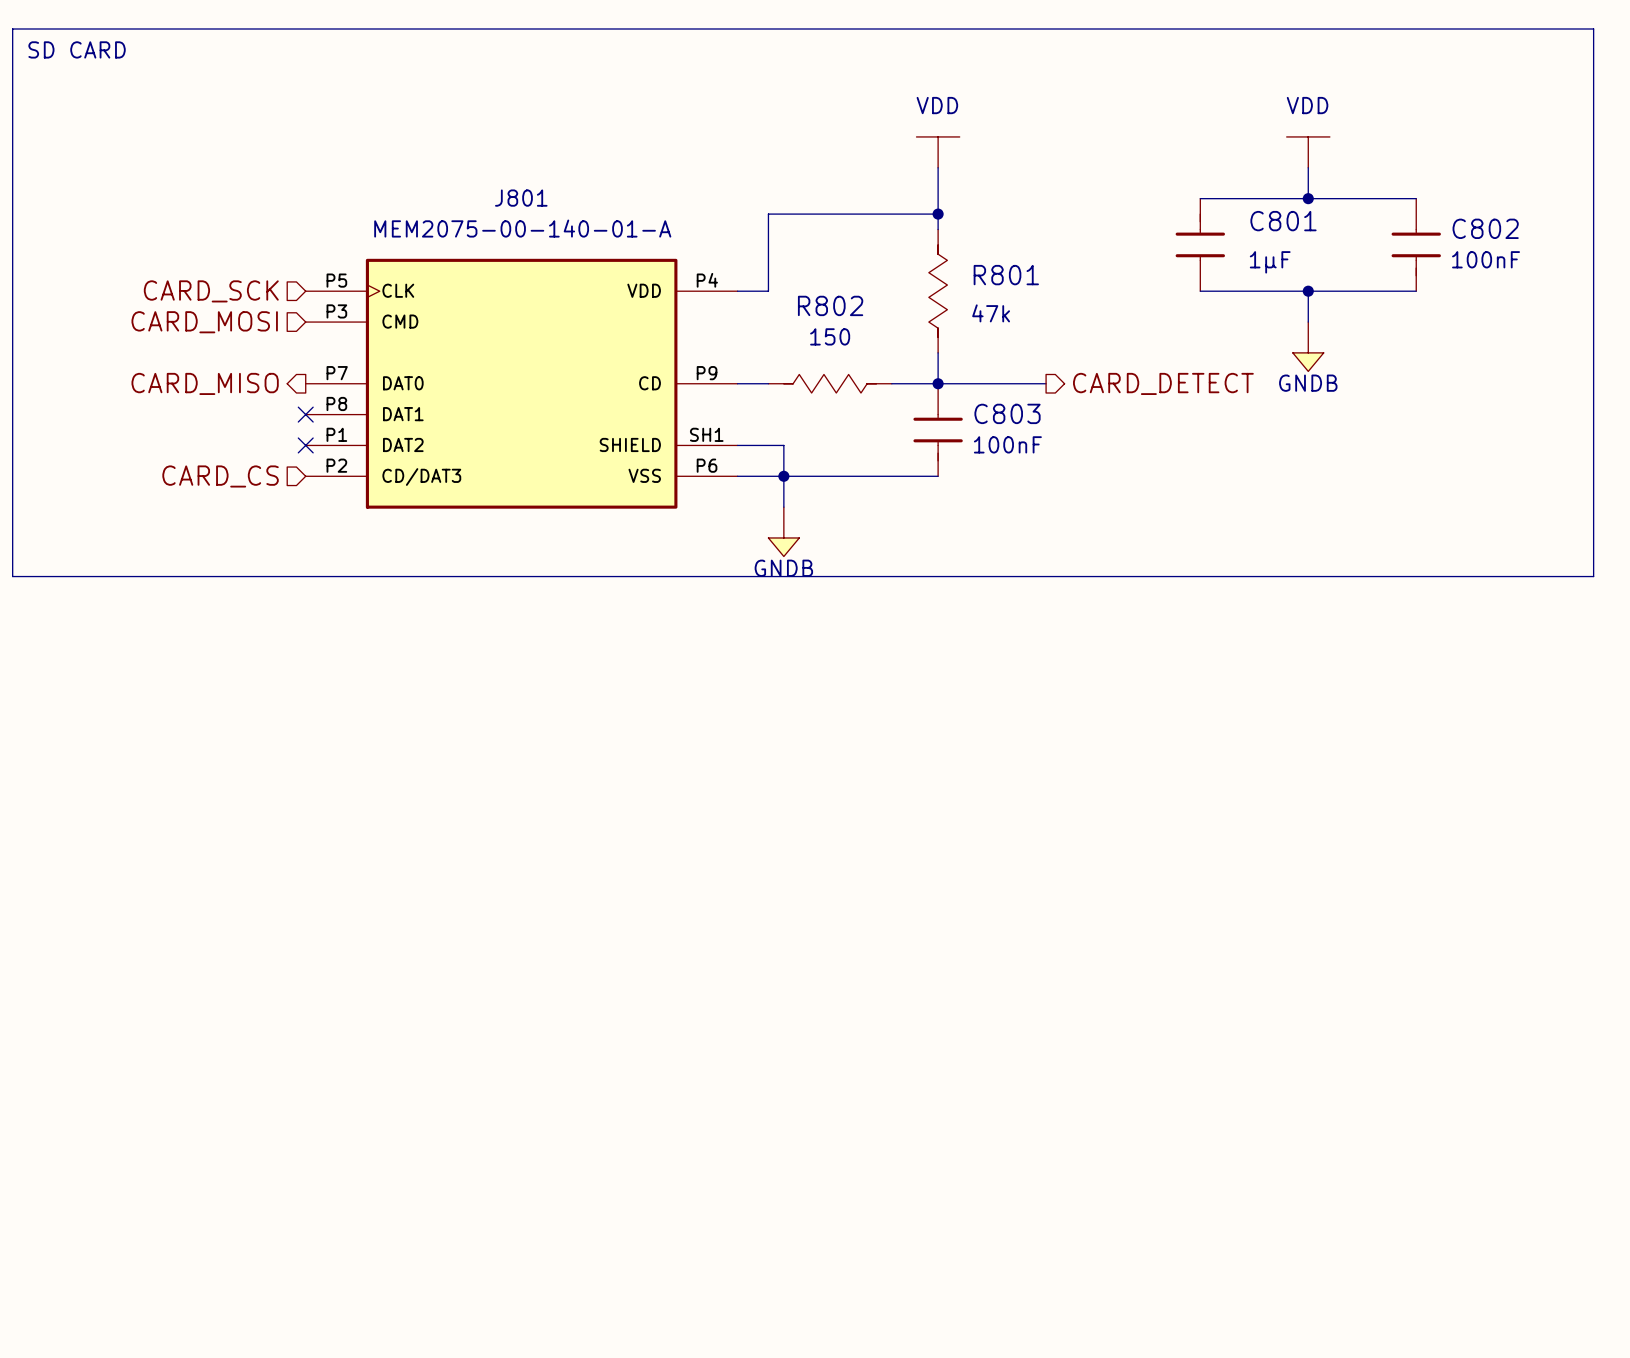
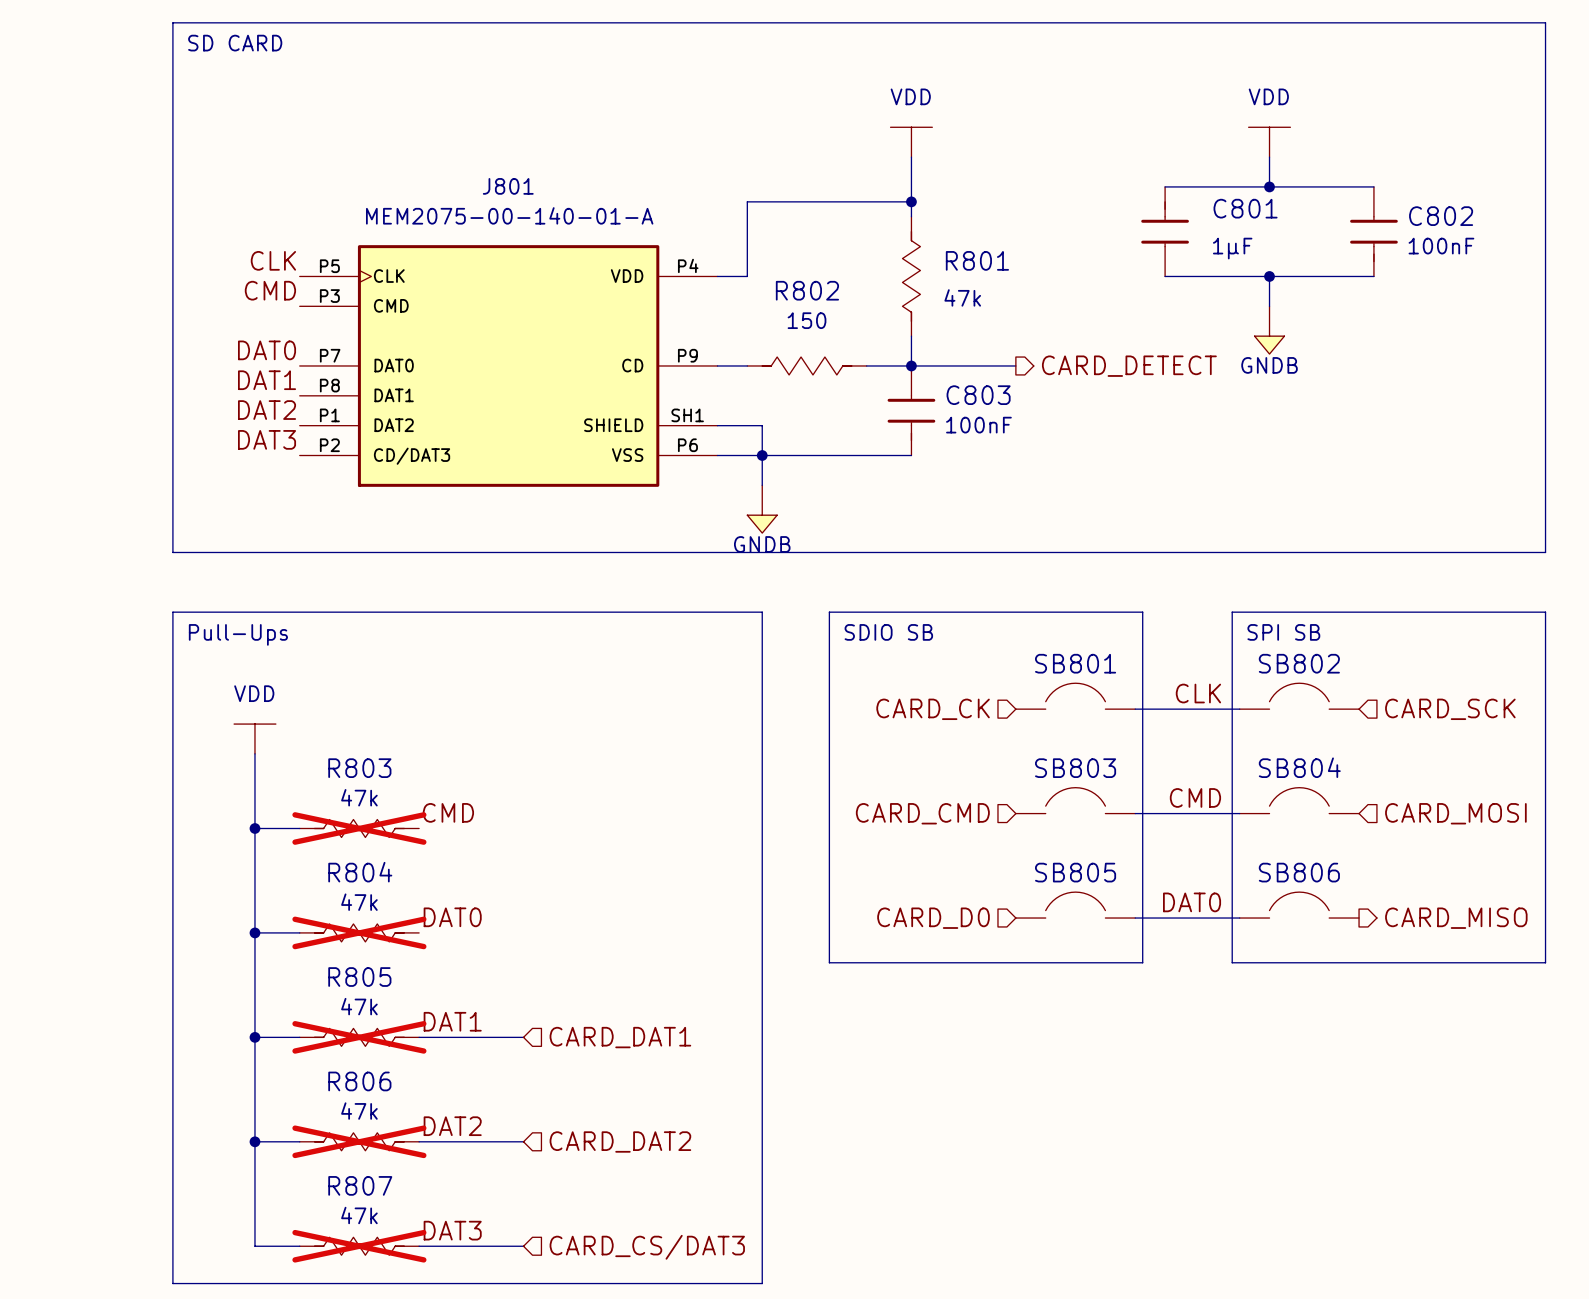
line: (174, 28) (12, 28) (12, 576) (174, 576) -> (172, 22) (172, 552)
text position: SD CARD (77, 49) -> SD CARD (235, 43)
label: none -> CLK (273, 260)
hierarchical label: CARD_SCK (211, 291) -> none
label: none -> CMD (270, 290)
hierarchical label: CARD_MOSI (204, 322) -> none
label: none -> DAT0 (267, 350)
hierarchical label: CARD_MISO (205, 383) -> none
label: none -> DAT1 (267, 380)
no-connect mark: (305, 414) -> none
label: none -> DAT2 (267, 410)
no-connect mark: (305, 445) -> none
label: none -> DAT3 (267, 439)
hierarchical label: CARD_CS (220, 476) -> none
line: none -> (172, 612) (762, 612) (762, 1283) (172, 1283) (172, 612)
line: none -> (829, 612) (1142, 612) (1142, 962) (829, 962) (829, 612)
line: none -> (1232, 612) (1545, 612) (1545, 962) (1232, 962) (1232, 612)
text: none -> SDIO SB (888, 632)
text: none -> SPI SB (1283, 632)
text: none -> Pull-Ups (238, 634)
label: none -> CLK (1198, 693)
SB801: none -> (1075, 696)
SB802: none -> (1299, 696)
hierarchical label: none -> CARD_CK (933, 709)
wire: none -> (1135, 709) (1239, 709)
hierarchical label: none -> CARD_SCK (1450, 709)
power symbol: none -> VDD (254, 738)
wire: none -> (254, 753) (254, 1246) (299, 1246)
label: none -> CMD (1195, 797)
SB803: none -> (1075, 800)
SB804: none -> (1299, 800)
label: none -> CMD (448, 812)
hierarchical label: none -> CARD_CMD (922, 813)
wire: none -> (1135, 813) (1239, 813)
hierarchical label: none -> CARD_MOSI (1455, 813)
wire: none -> (254, 828) (299, 828)
junction: none -> (254, 828)
R803: none -> (359, 828)
label: none -> DAT0 (1192, 902)
SB805: none -> (1075, 905)
SB806: none -> (1299, 905)
label: none -> DAT0 (452, 917)
hierarchical label: none -> CARD_D0 (933, 918)
wire: none -> (1135, 918) (1239, 918)
hierarchical label: none -> CARD_MISO (1456, 918)
wire: none -> (254, 932) (299, 932)
junction: none -> (254, 932)
R804: none -> (359, 932)
label: none -> DAT1 (452, 1021)
wire: none -> (254, 1037) (299, 1037)
junction: none -> (254, 1037)
R805: none -> (359, 1037)
wire: none -> (419, 1037) (523, 1037)
hierarchical label: none -> CARD_DAT1 (620, 1037)
label: none -> DAT2 (452, 1126)
wire: none -> (254, 1141) (299, 1141)
junction: none -> (254, 1141)
R806: none -> (359, 1141)
wire: none -> (419, 1141) (523, 1141)
hierarchical label: none -> CARD_DAT2 (620, 1141)
label: none -> DAT3 (452, 1230)
R807: none -> (359, 1246)
wire: none -> (419, 1246) (523, 1246)
hierarchical label: none -> CARD_CS/DAT3 (647, 1247)

